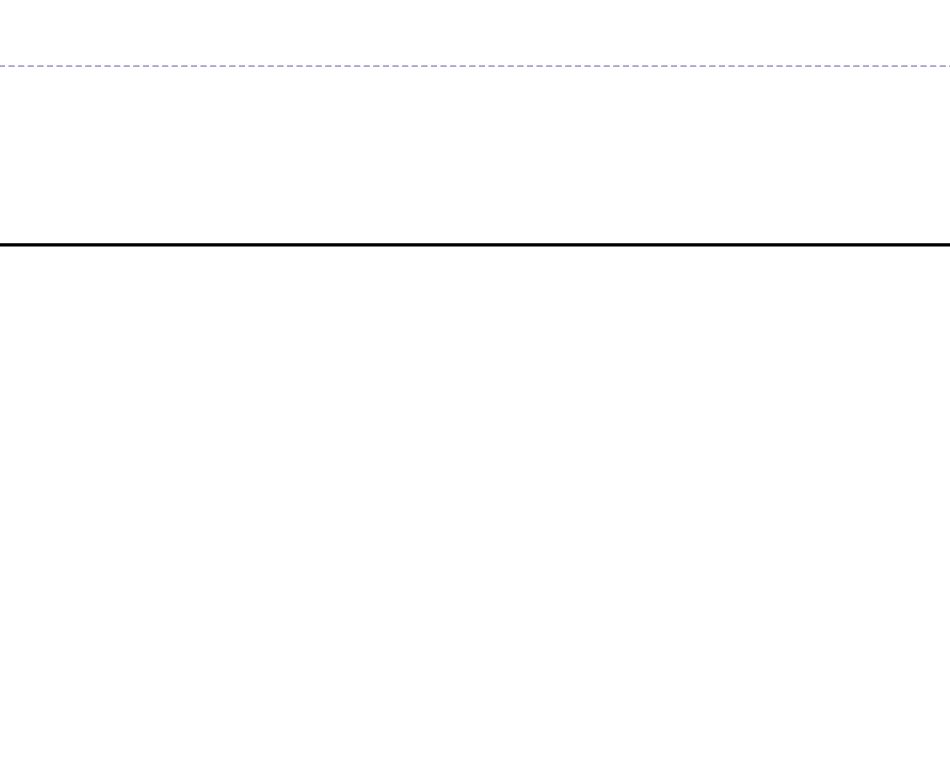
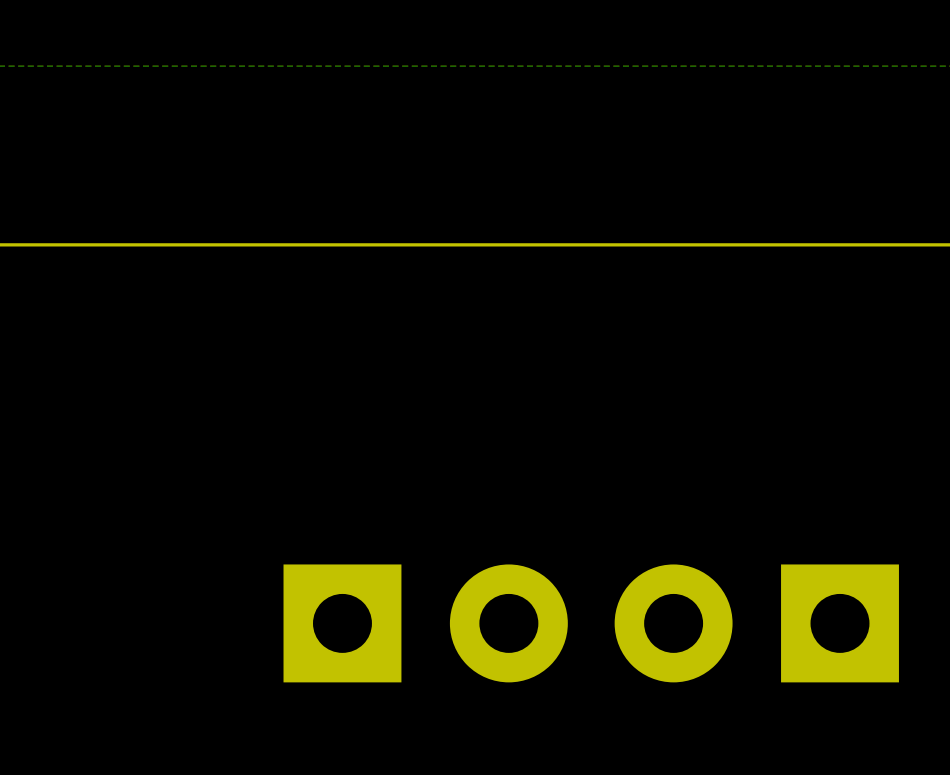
part: none -> (425, 623)
part: none -> (756, 623)

